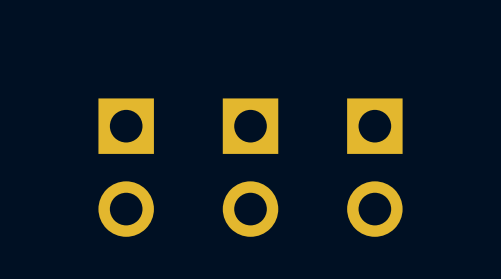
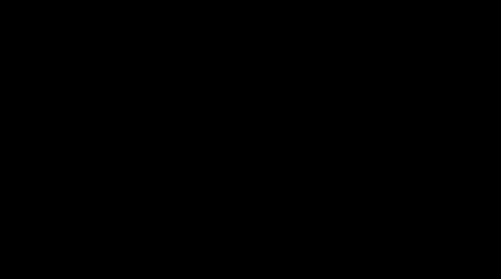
part: (126, 167) -> none
part: (250, 167) -> none
part: (374, 167) -> none

